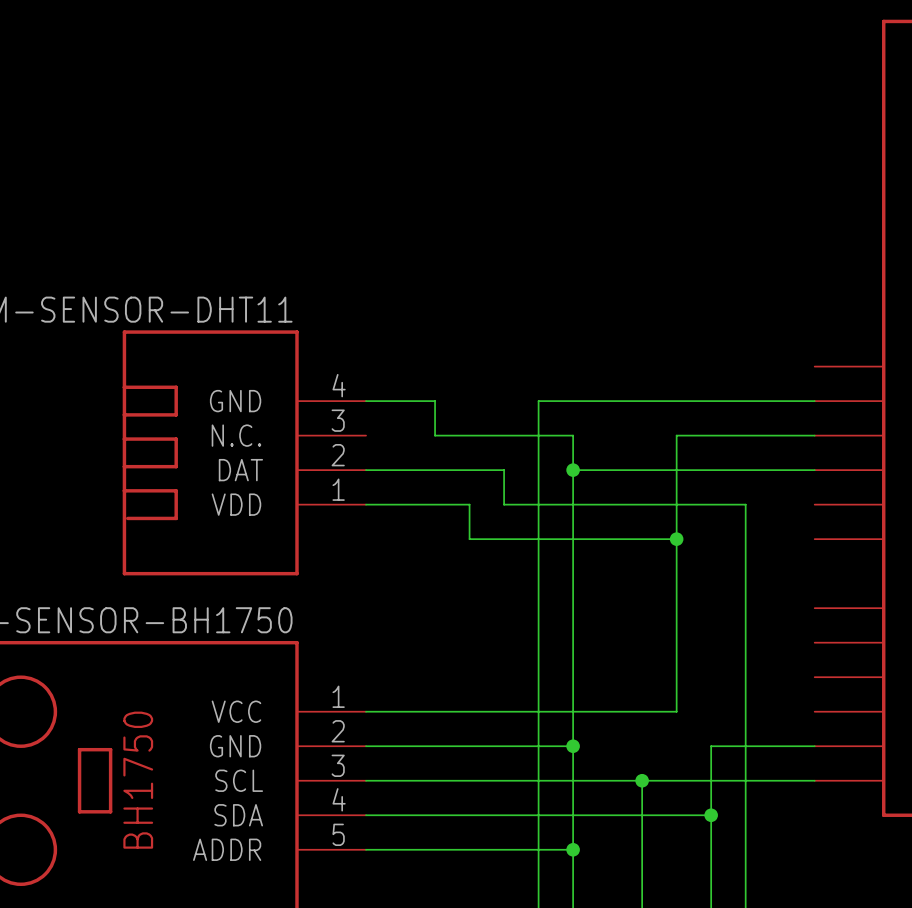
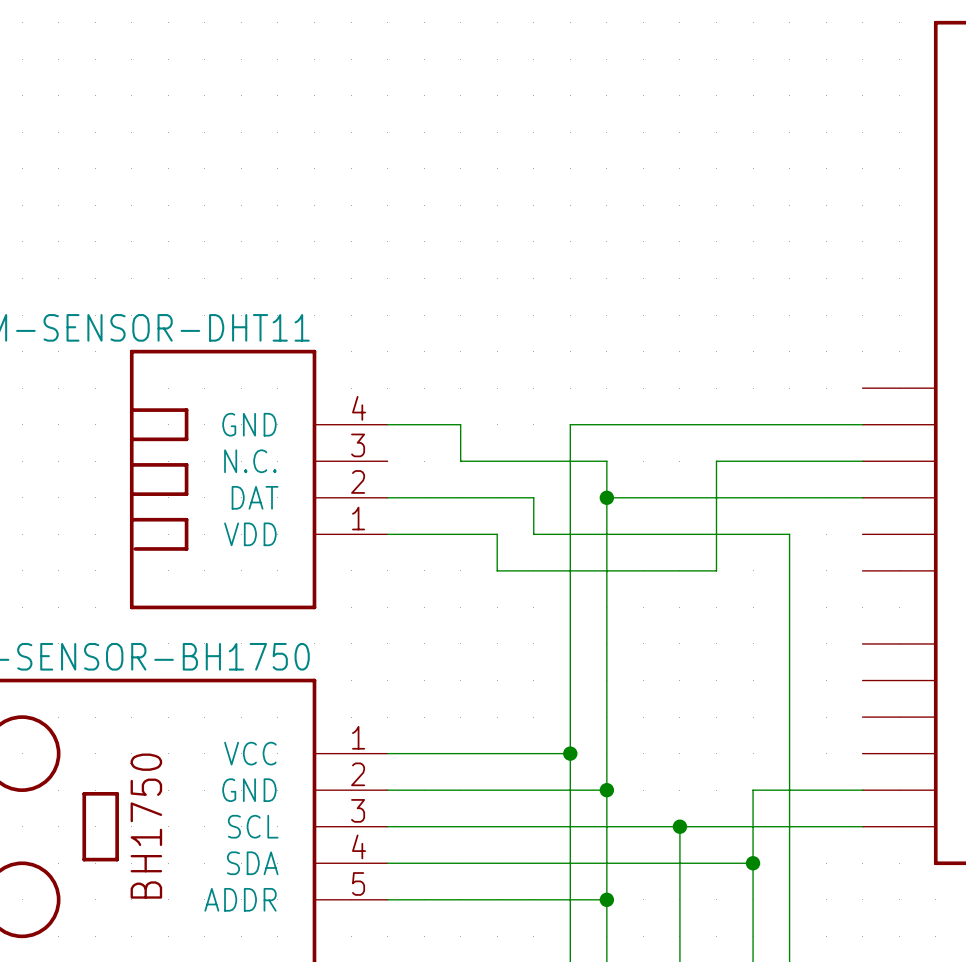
wire: (676, 539) (676, 711) (538, 711) -> none
junction: (676, 539) -> none
junction: none -> (570, 753)

